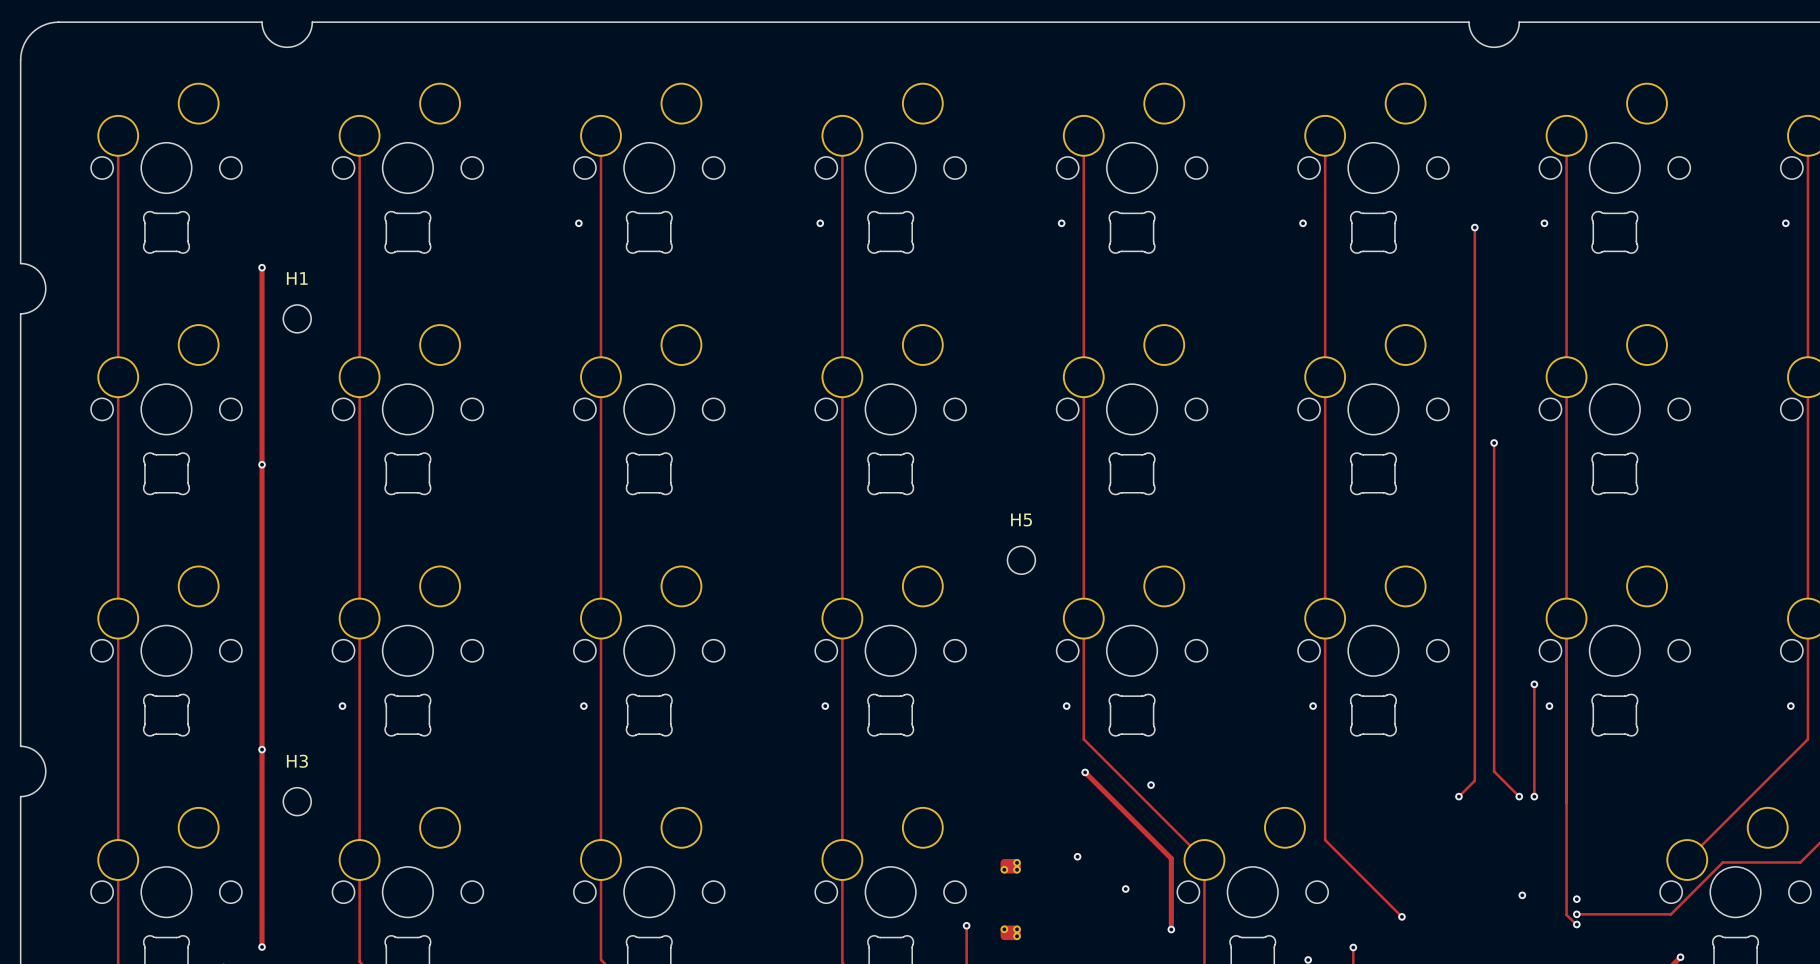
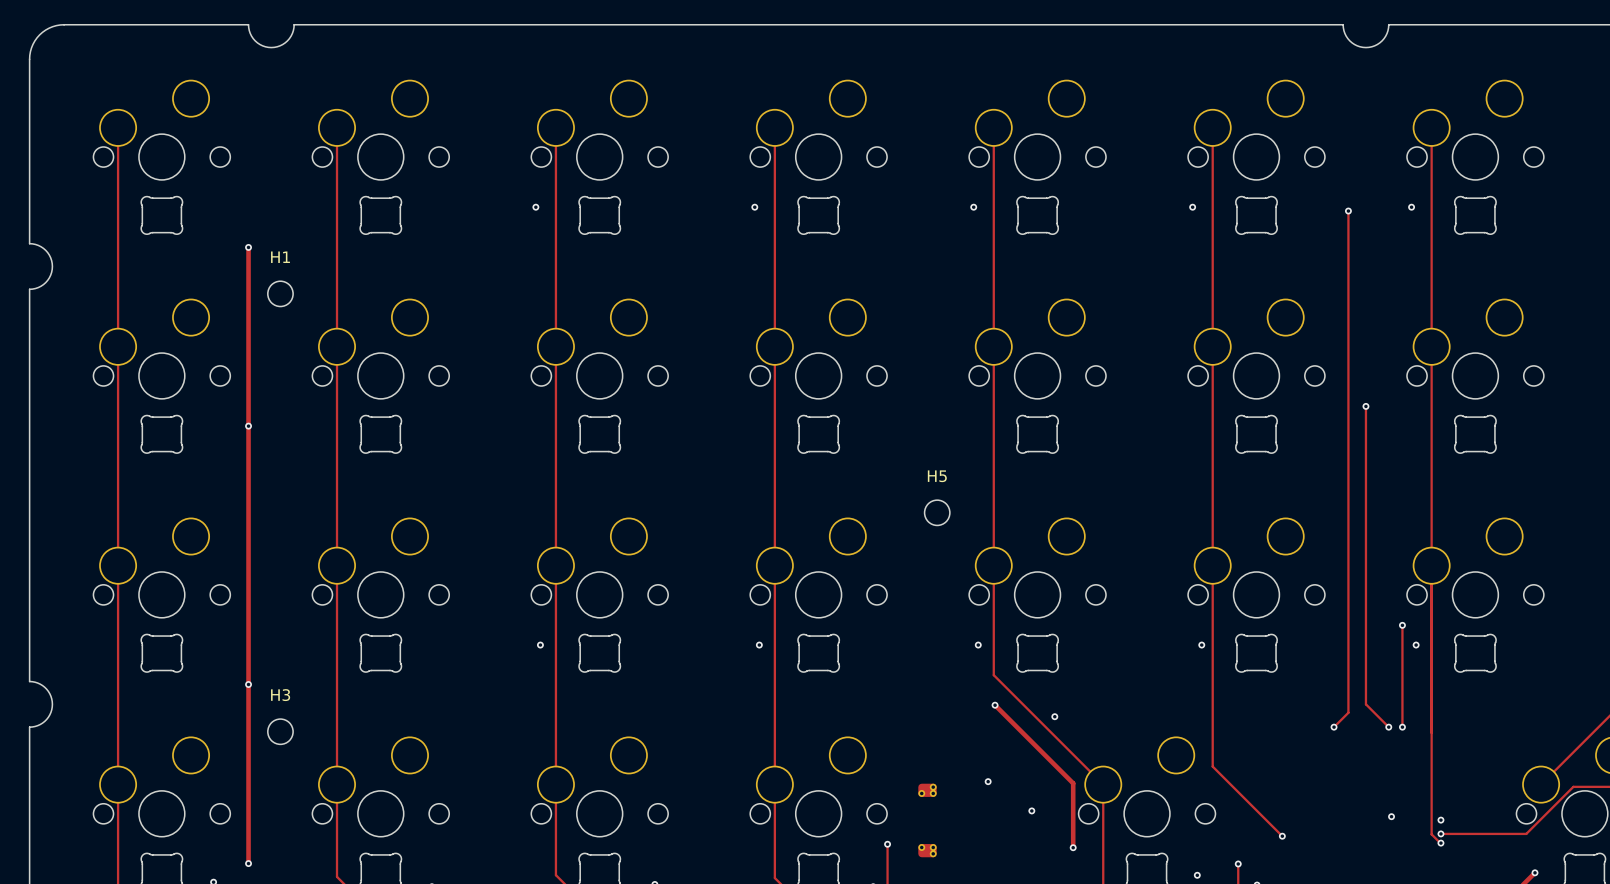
via: (342, 706) -> none

